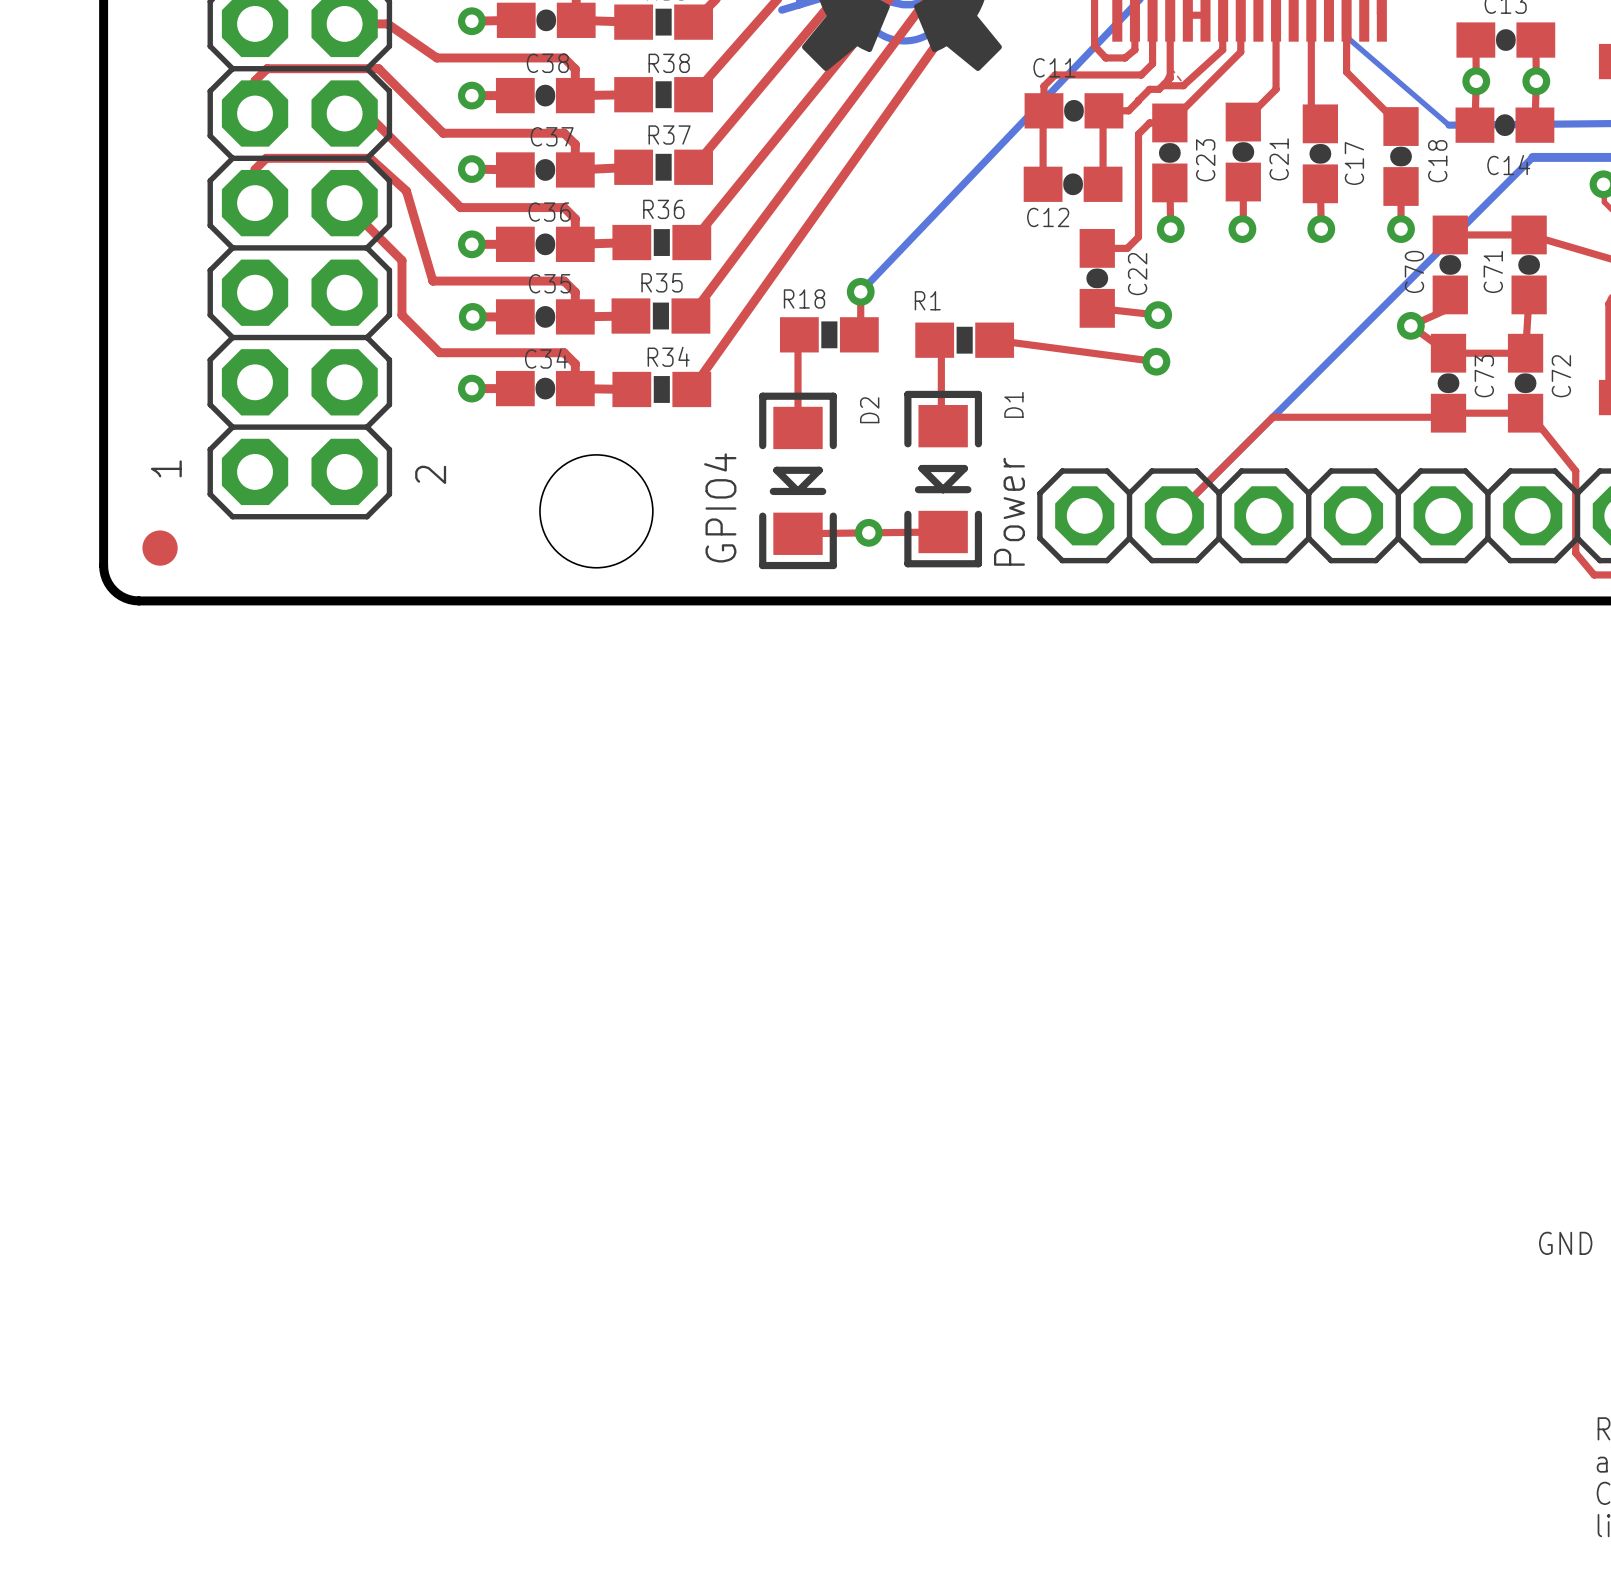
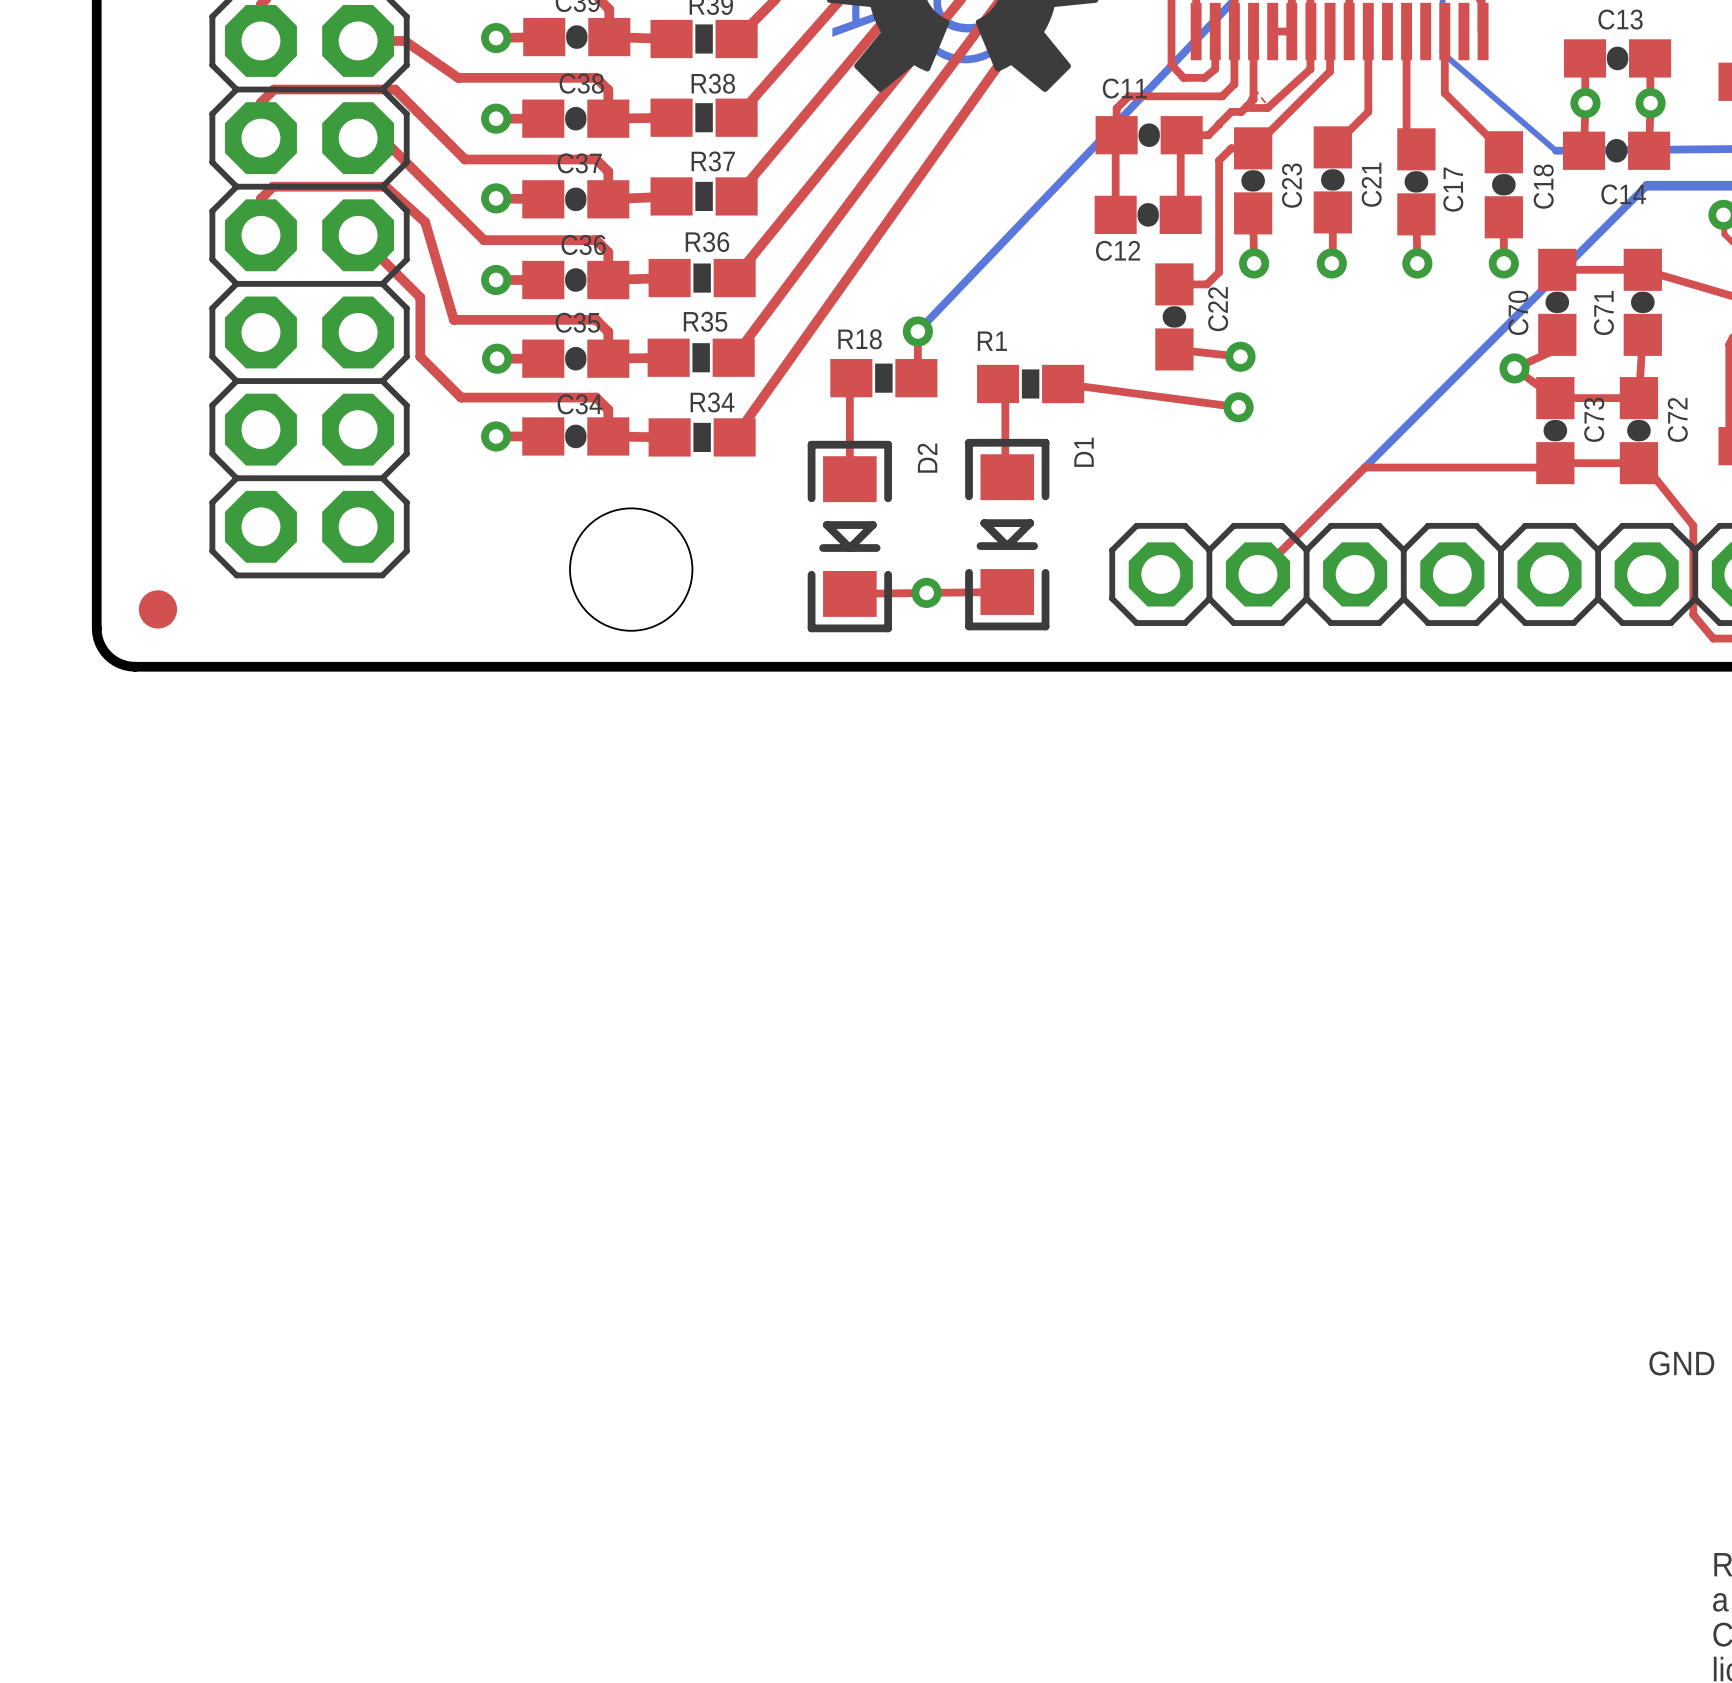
text: 1 (166, 468) -> none
text: 2 (430, 474) -> none
text: GPIO4 (720, 507) -> none
text: Power (1009, 511) -> none

